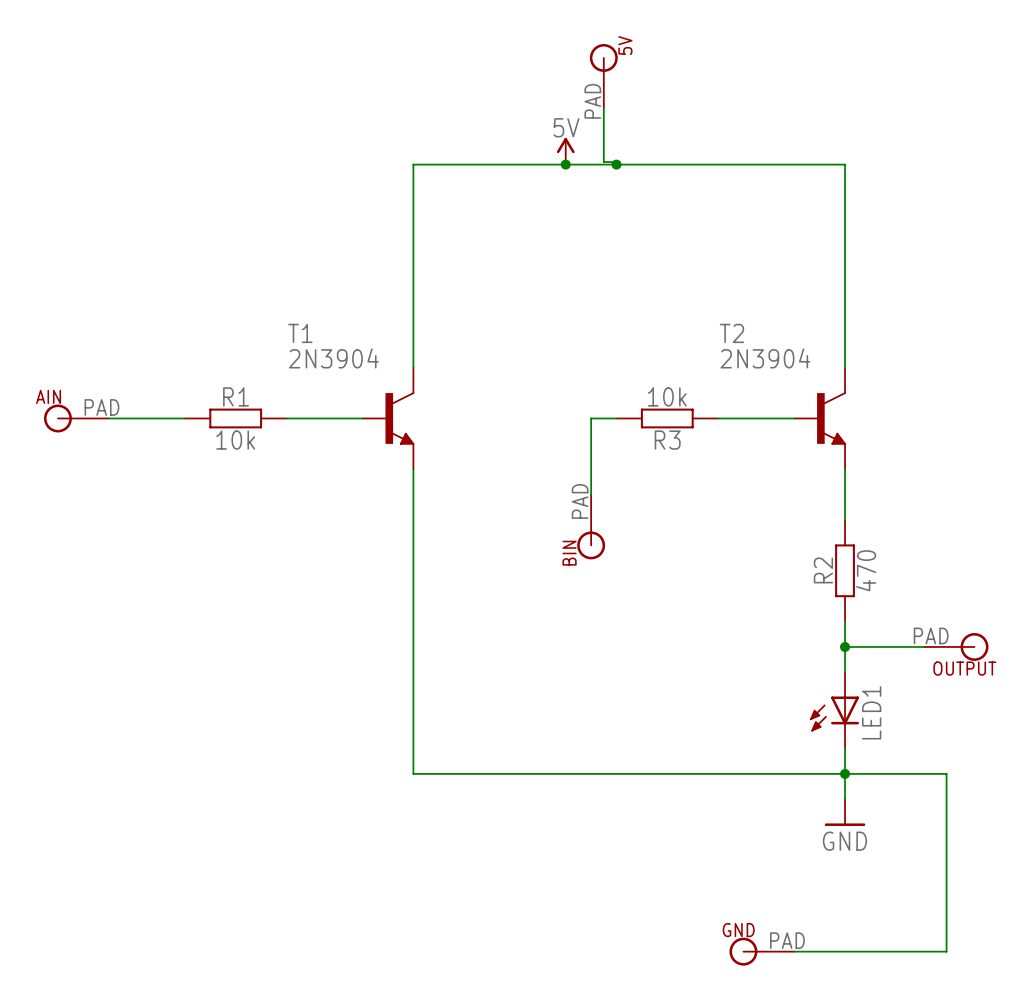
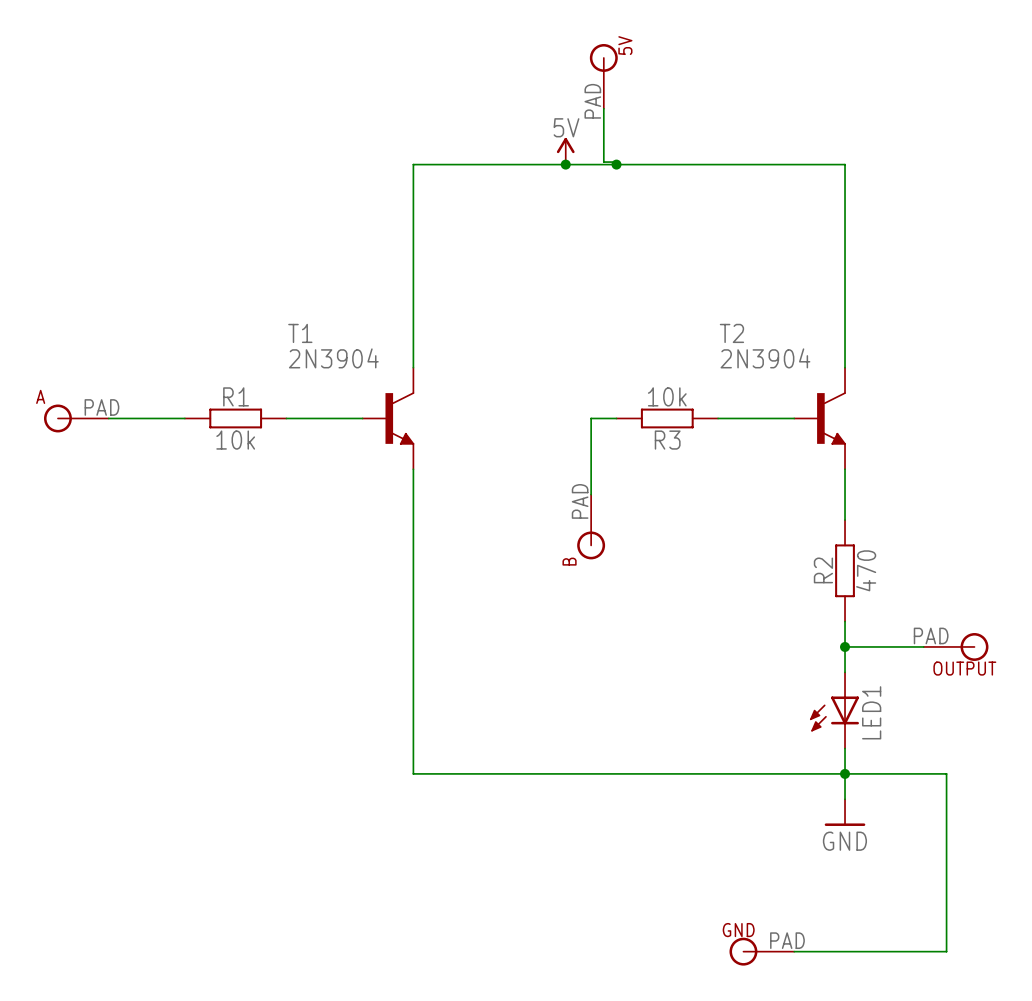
AIN name: AIN (48, 396) -> A (40, 396)
BIN name: BIN (569, 553) -> B (569, 561)

